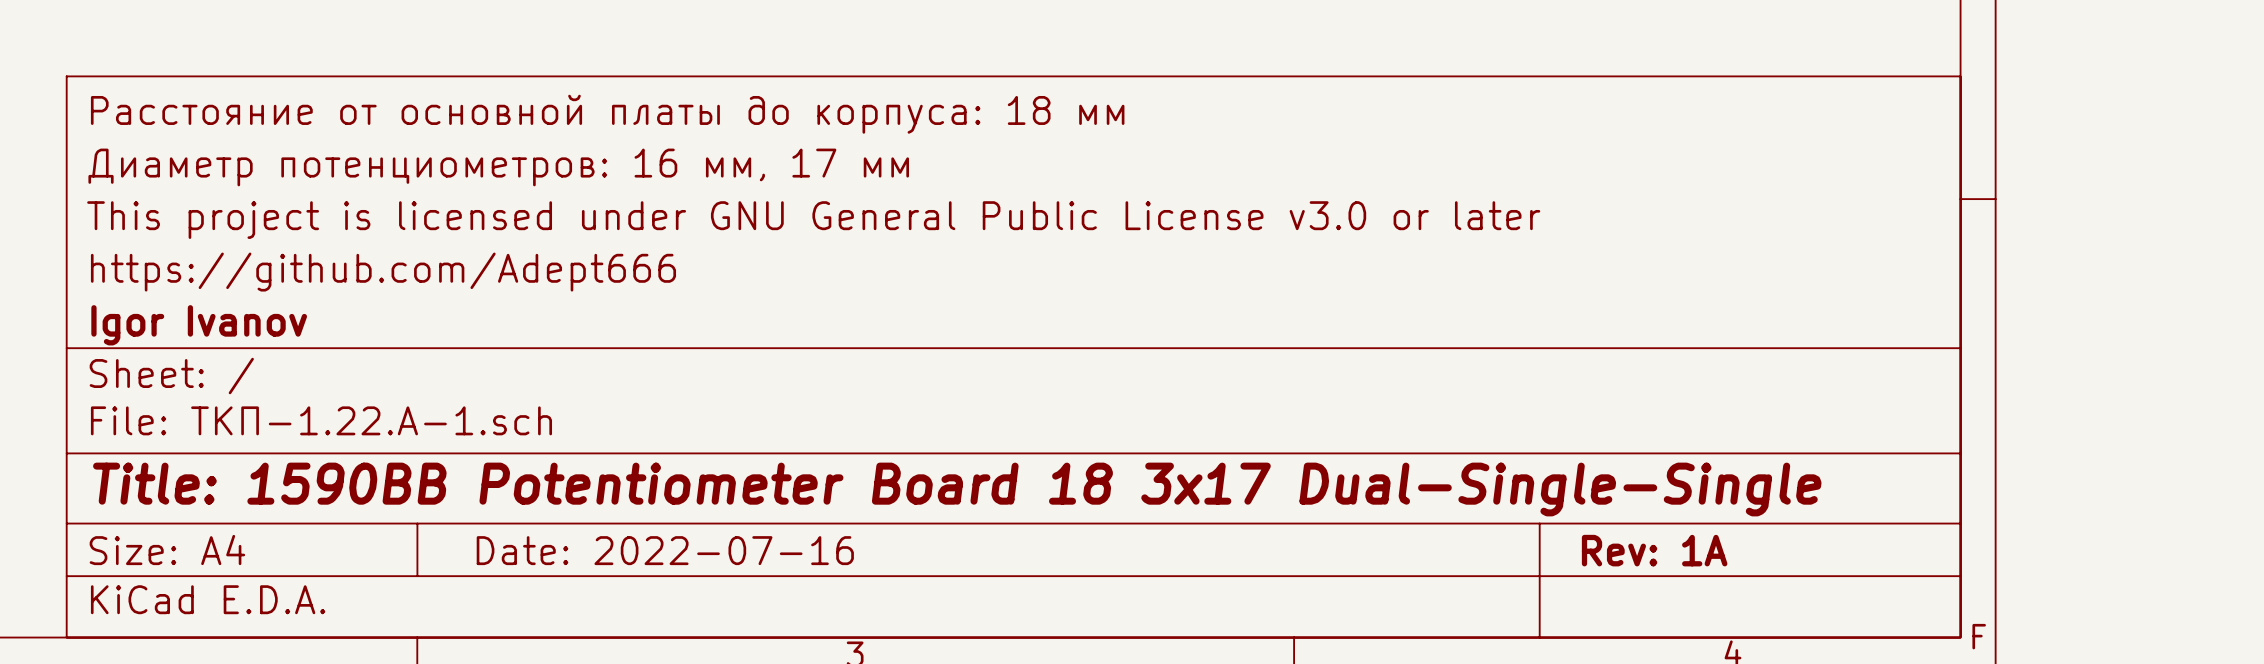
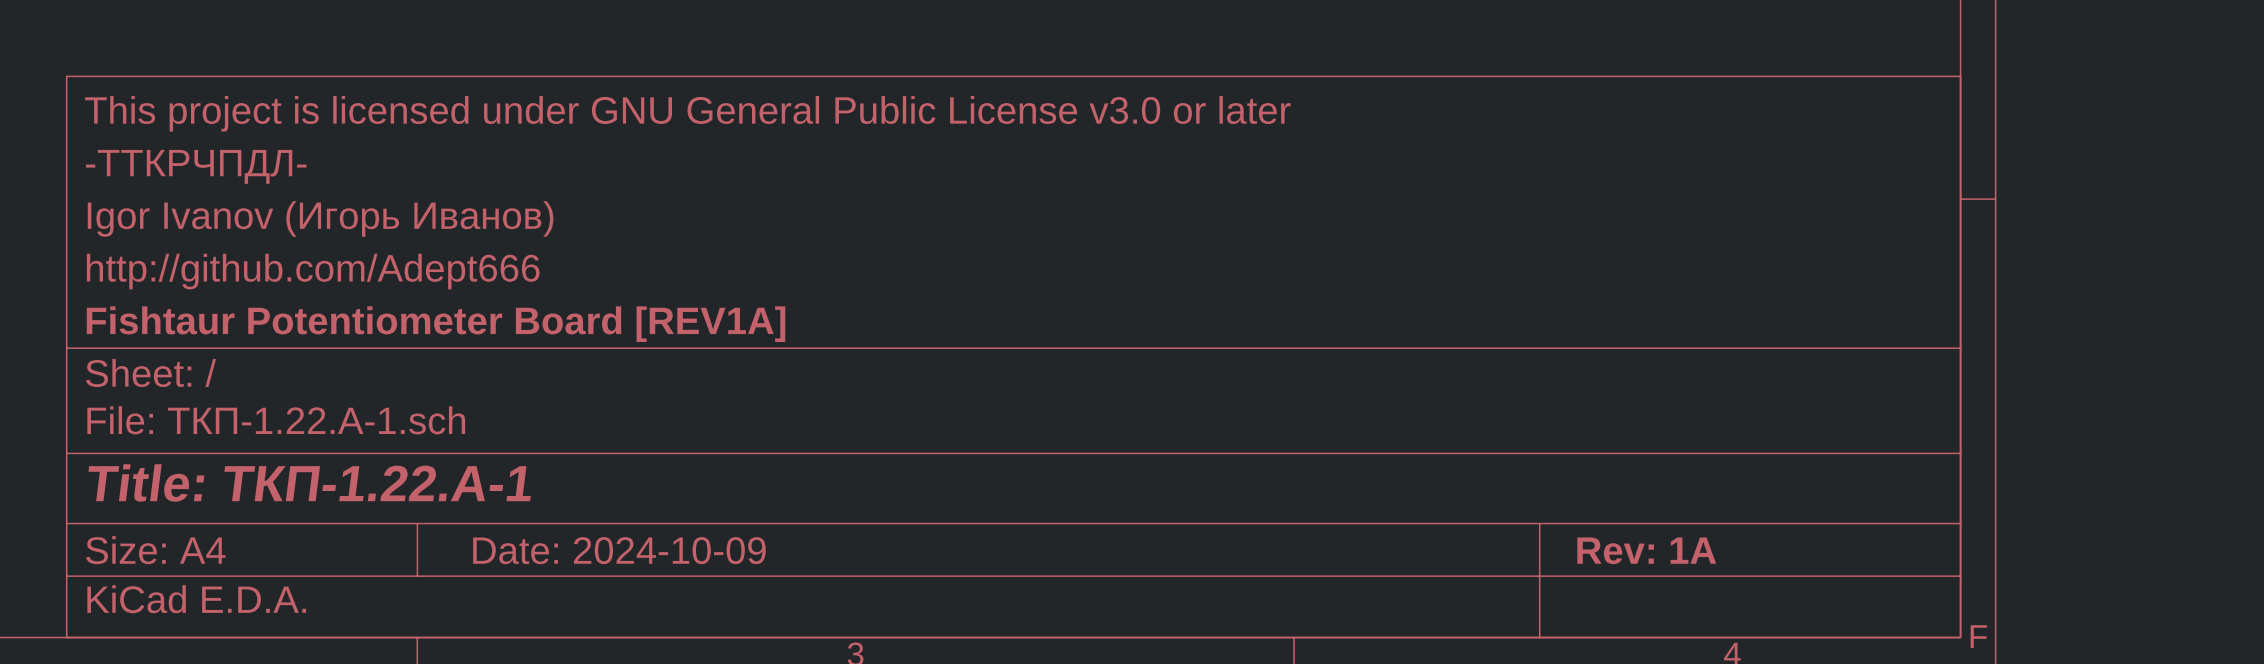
title block: Расстояние от основной платы до корпуса: 18 мм (607, 114) -> This project is licensed under GNU General Public License v3.0 or later (687, 113)
title block: Диаметр потенциометров: 16 мм, 17 мм (498, 167) -> -ТТКРЧПДЛ- (196, 166)
title block: This project is licensed under GNU General Public License v3.0 or later (813, 220) -> Igor Ivanov (Игорь Иванов) (320, 218)
title block: https://github.com/Adept666 (383, 272) -> http://github.com/Adept666 (313, 271)
title block: Igor Ivanov (199, 325) -> Fishtaur Potentiometer Board [REV1A] (436, 324)
title block: Title: 1590BB Potentiometer Board 18 3x17 Dual-Single-Single (957, 489) -> Title: ТКП-1.22.A-1 (309, 482)
title block: Date: 2022-07-16 (665, 550) -> Date: 2024-10-09 (619, 550)

